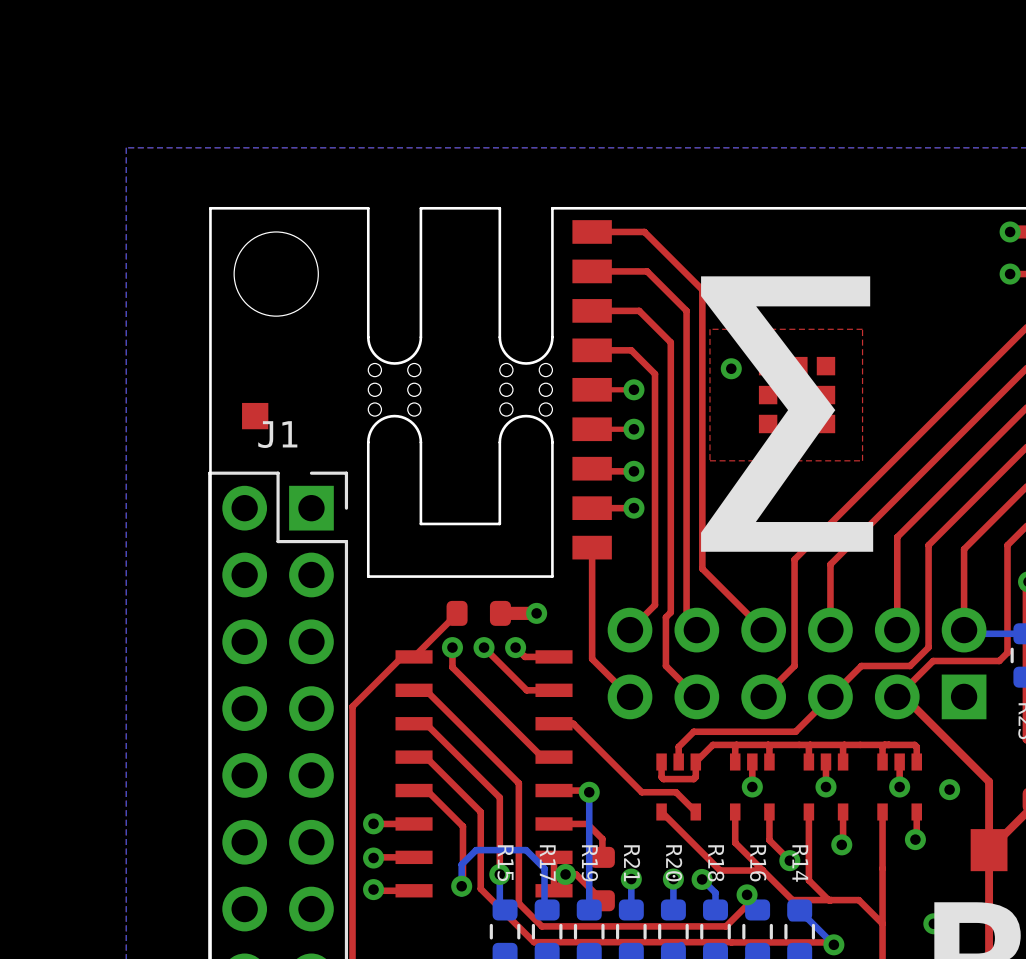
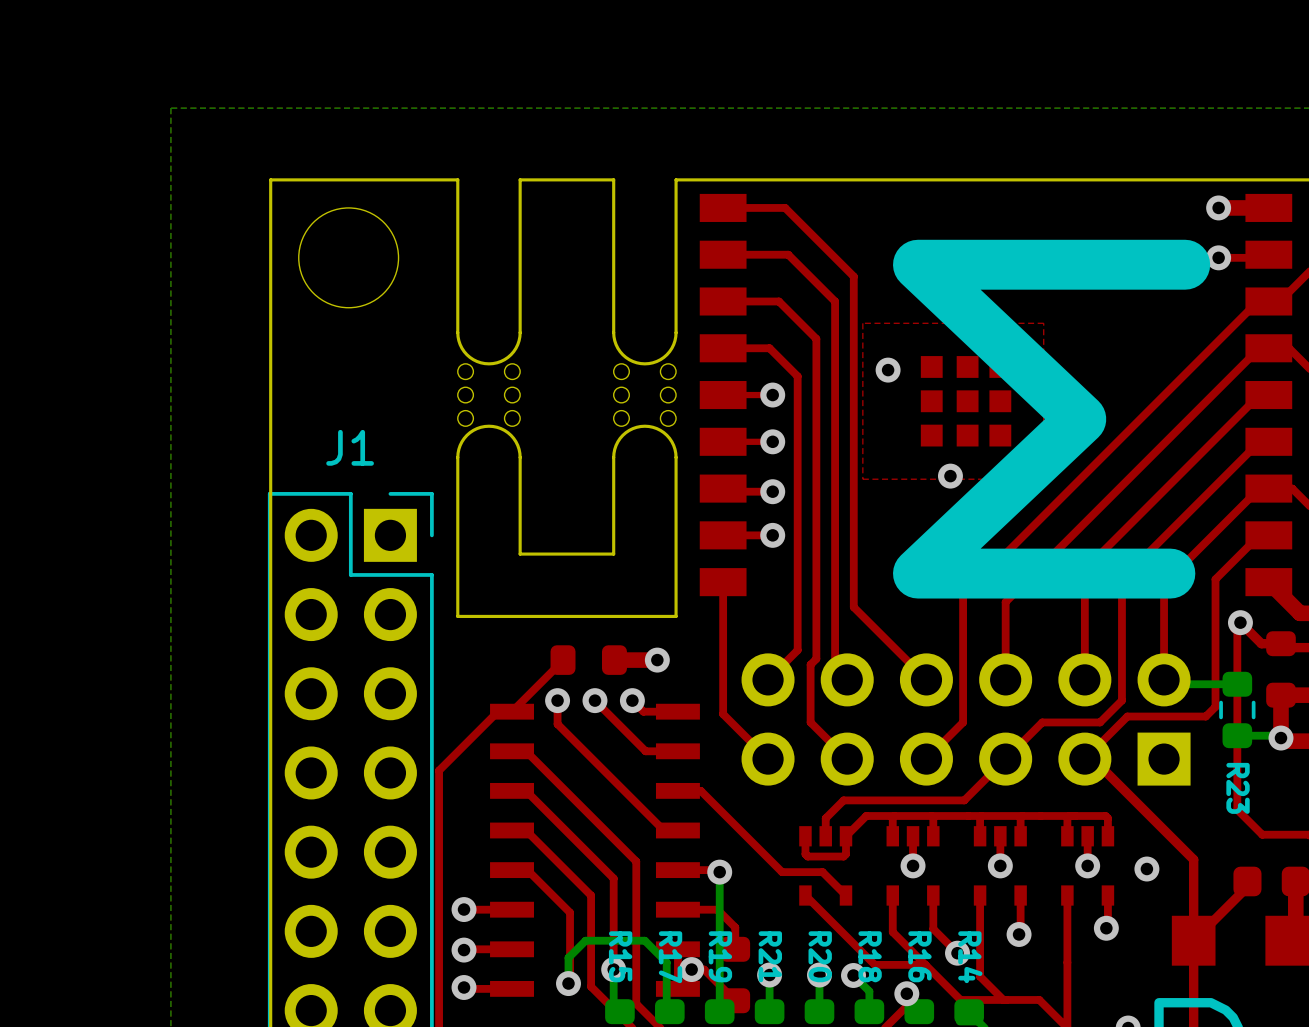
part: (255, 416) -> none

